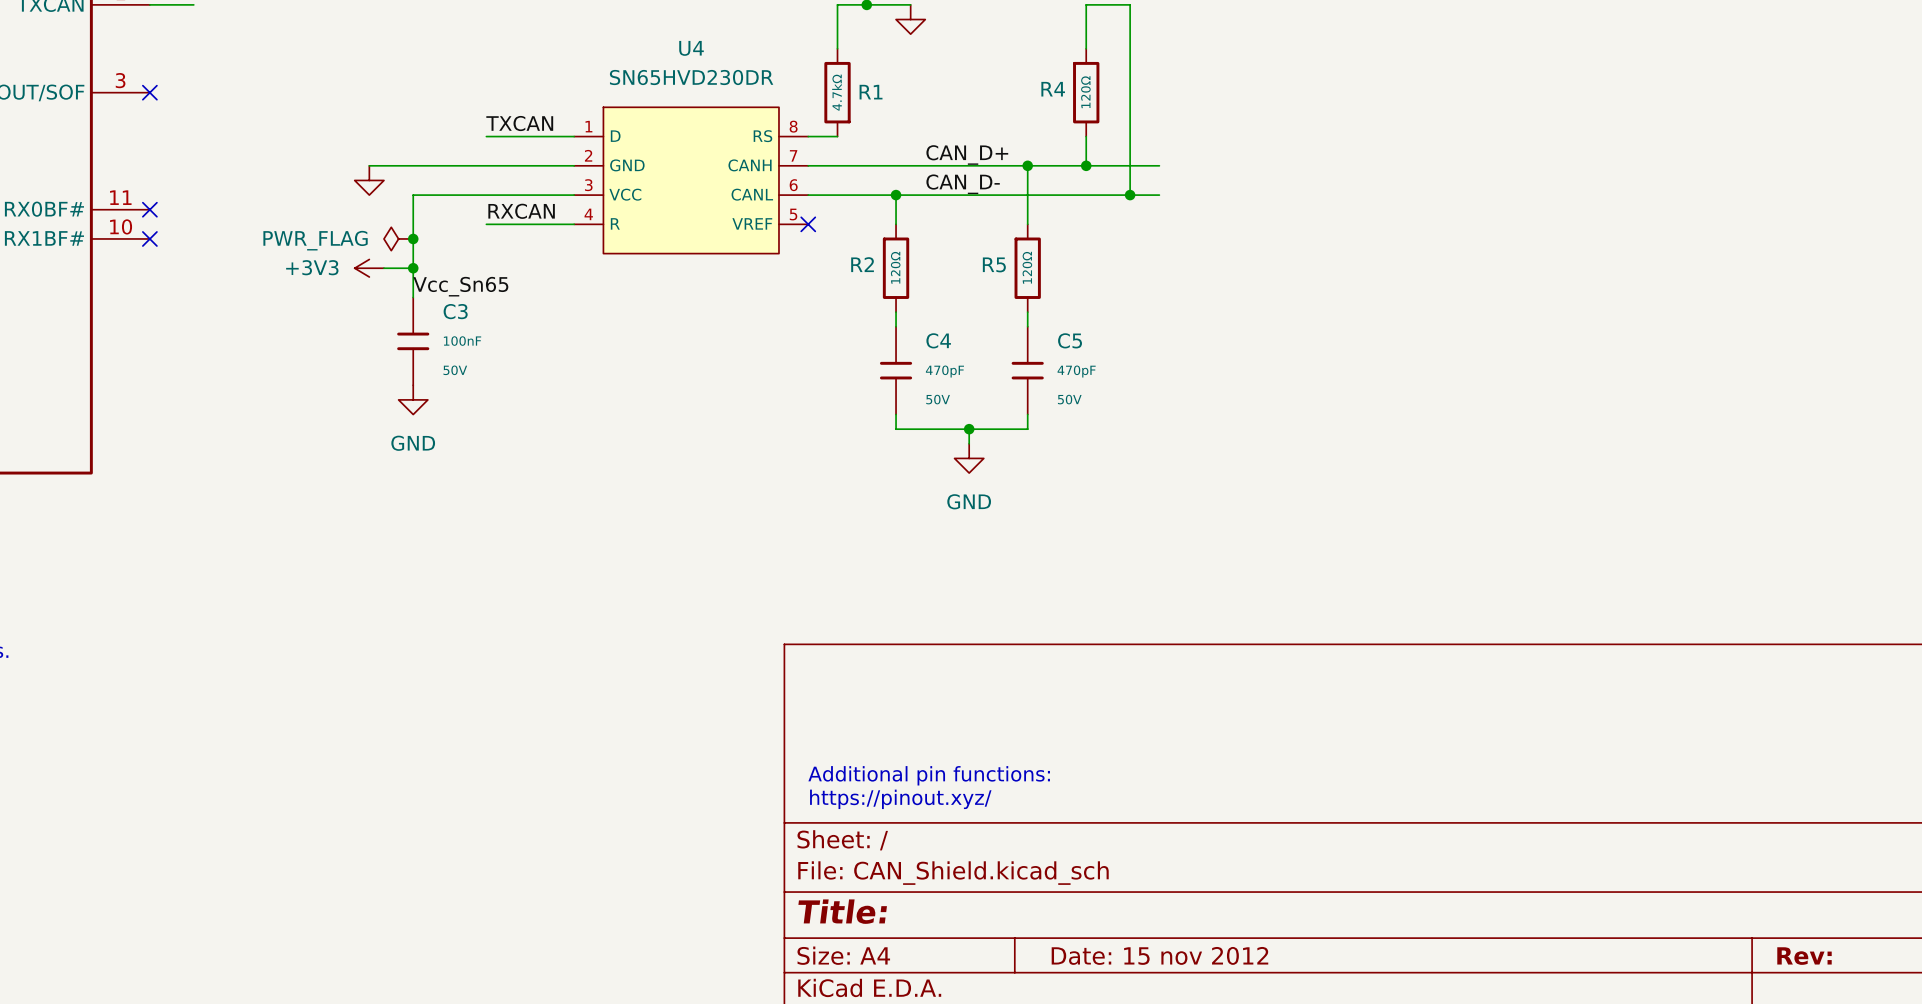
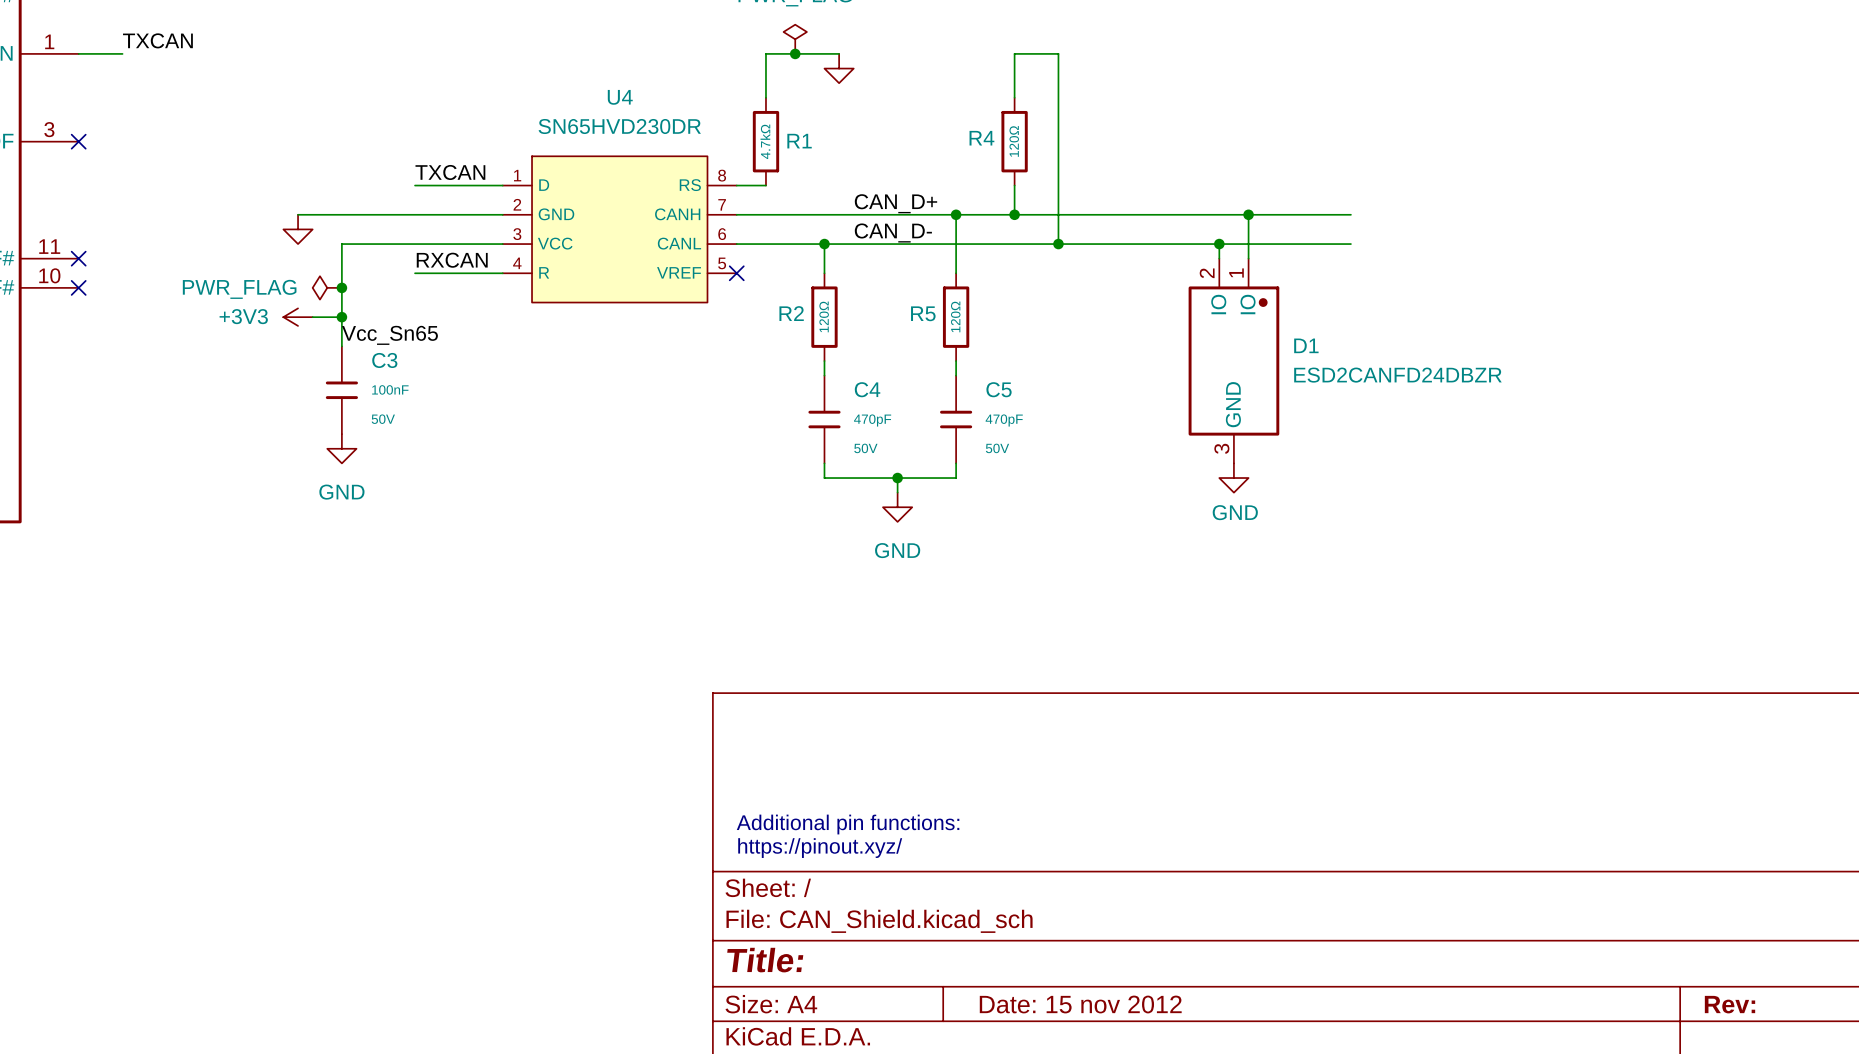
wire: none -> (1087, 214) (1350, 214)
wire: none -> (1248, 214) (1248, 258)
junction: none -> (1248, 214)
wire: none -> (1087, 244) (1350, 244)
wire: none -> (1219, 244) (1219, 258)
junction: none -> (1219, 244)
D1: none -> ESD2CANFD24DBZR (1233, 361)
power symbol: none -> GND (1233, 478)

